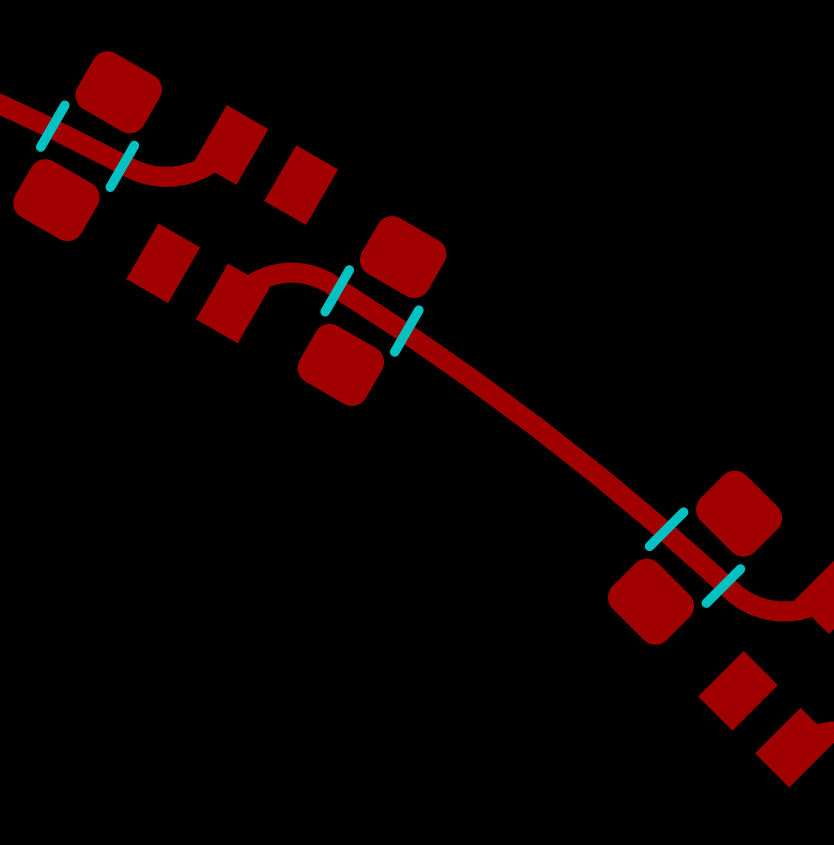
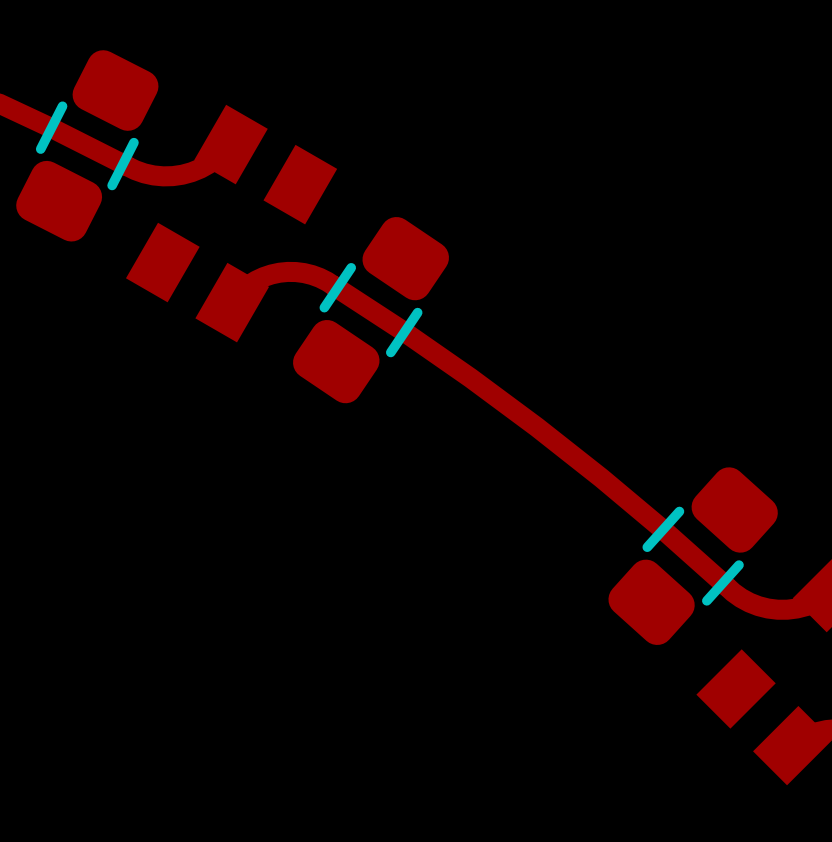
part rotation: 0° (87, 146) -> 3° counterclockwise (87, 145)
part rotation: 0° (372, 310) -> 4° clockwise (371, 310)
part rotation: 0° (695, 557) -> 3° counterclockwise (693, 556)

